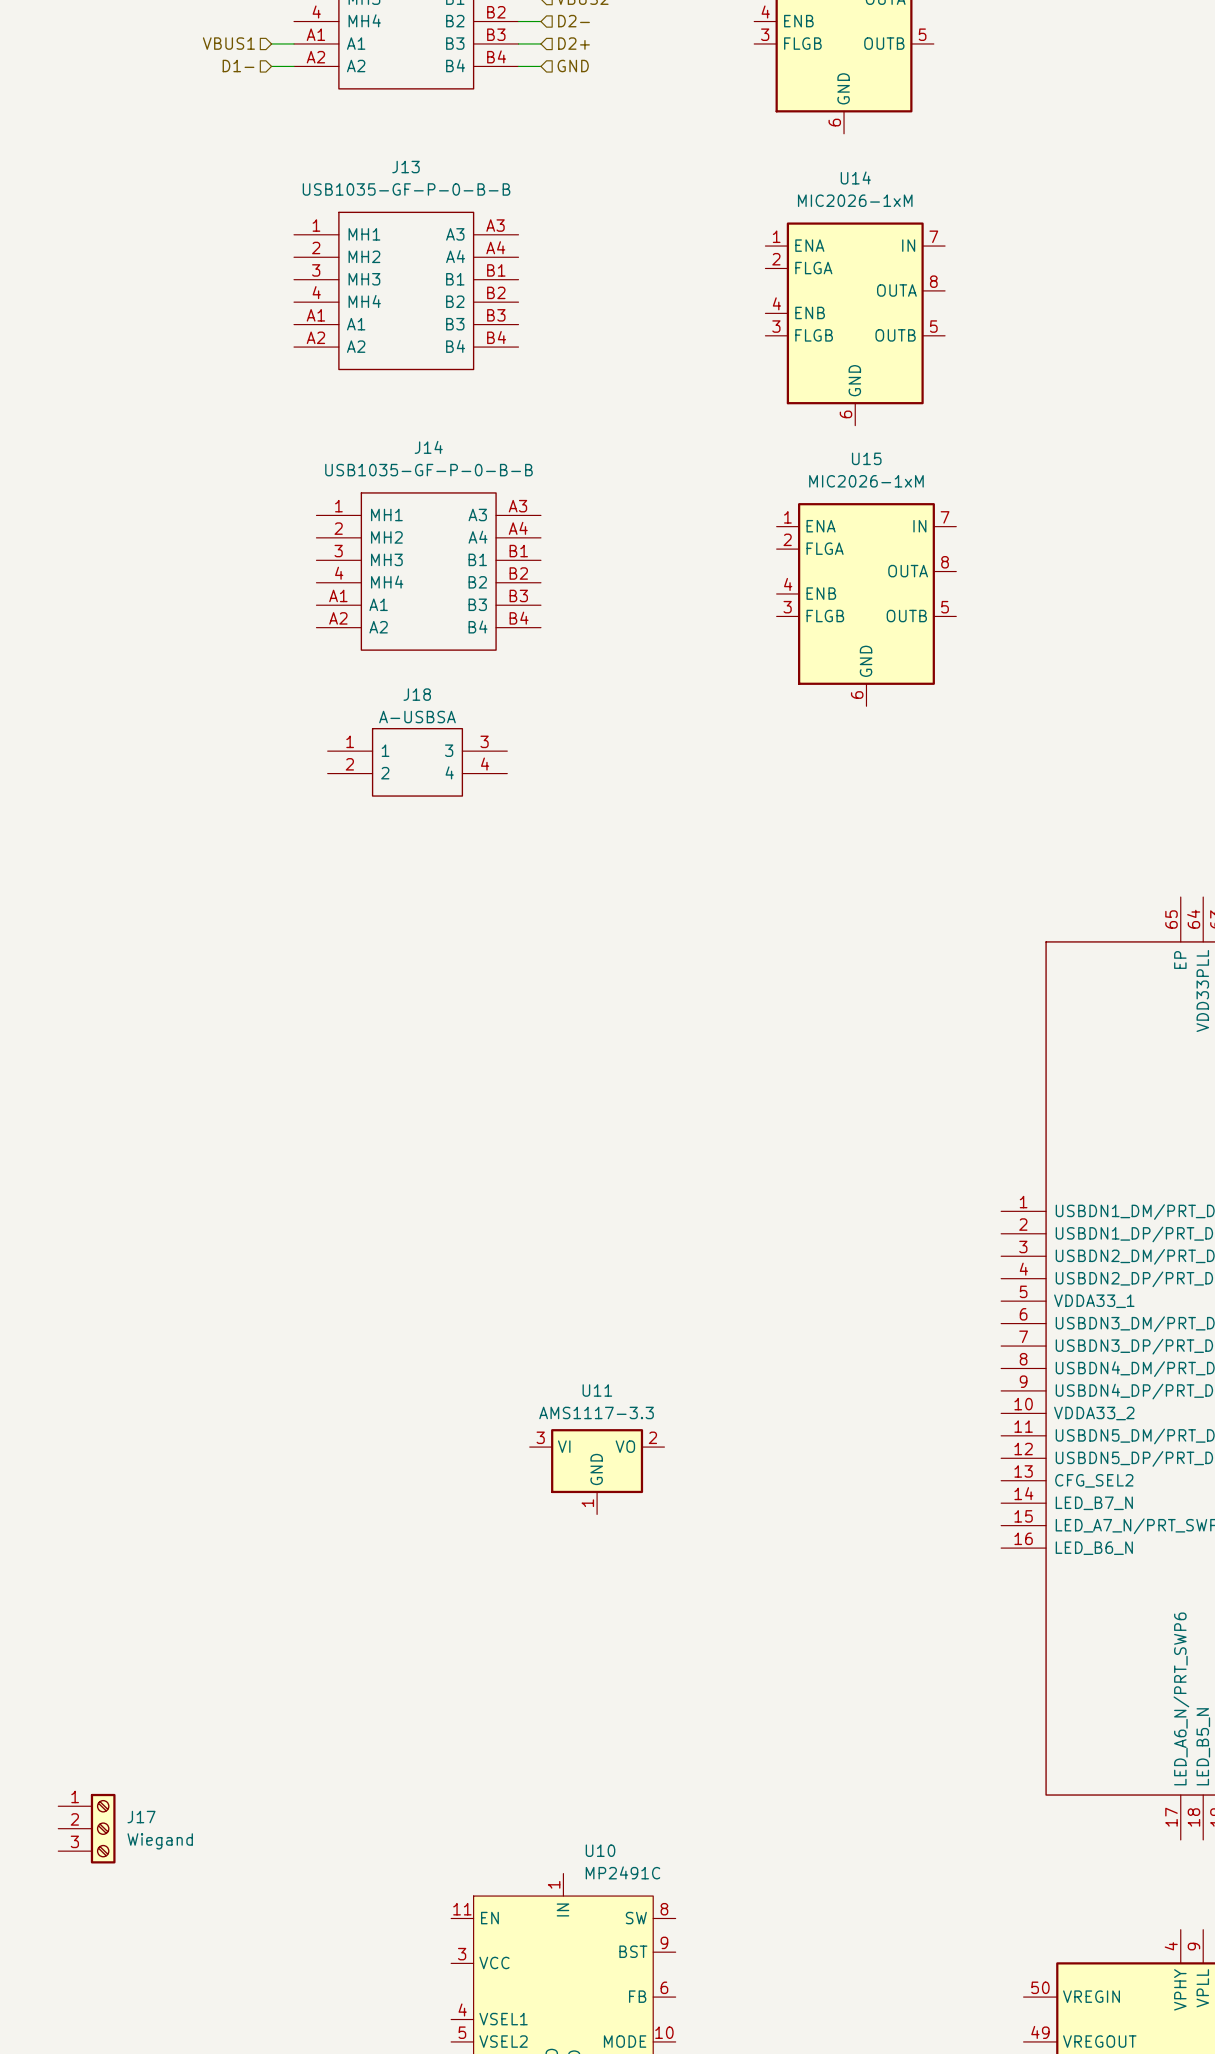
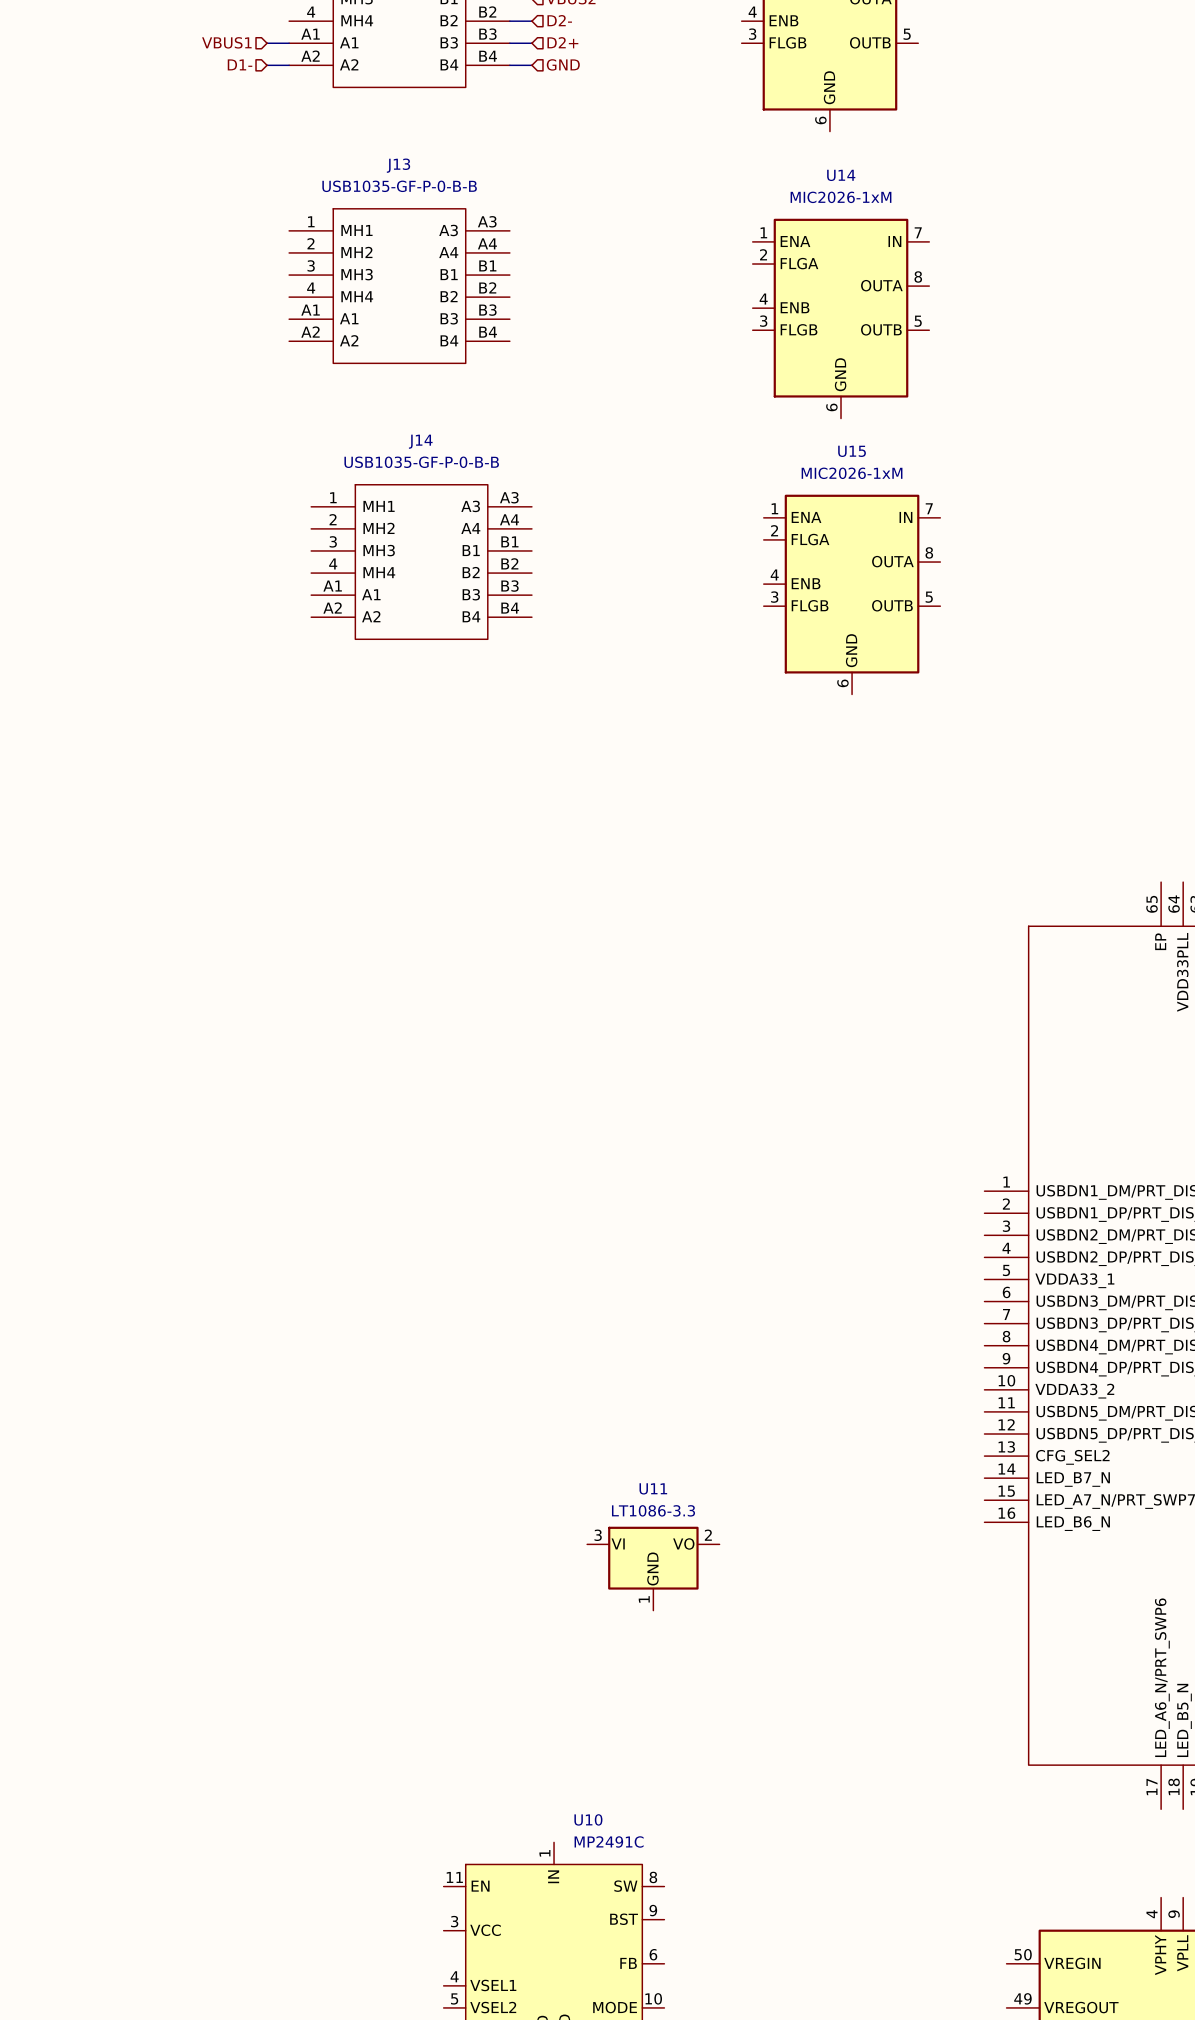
J18: A-USBSA (417, 762) -> none
U11 value: AMS1117-3.3 (596, 1412) -> LT1086-3.3 (653, 1510)
U11 position: (597, 1471) -> (653, 1568)
J17: Wiegand (86, 1828) -> none

